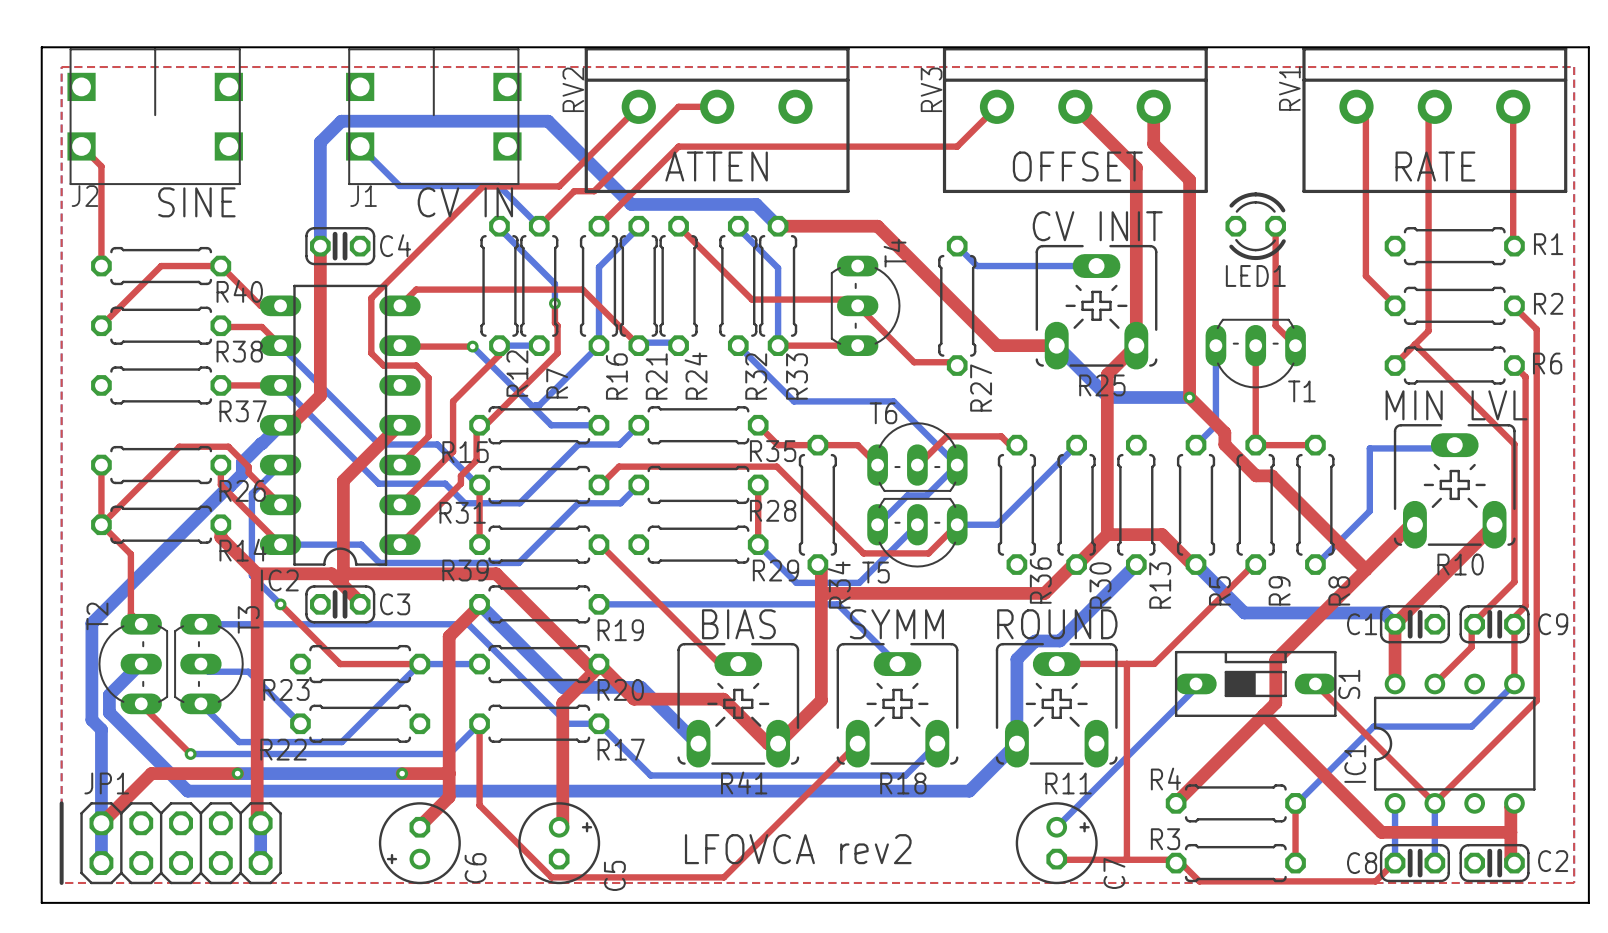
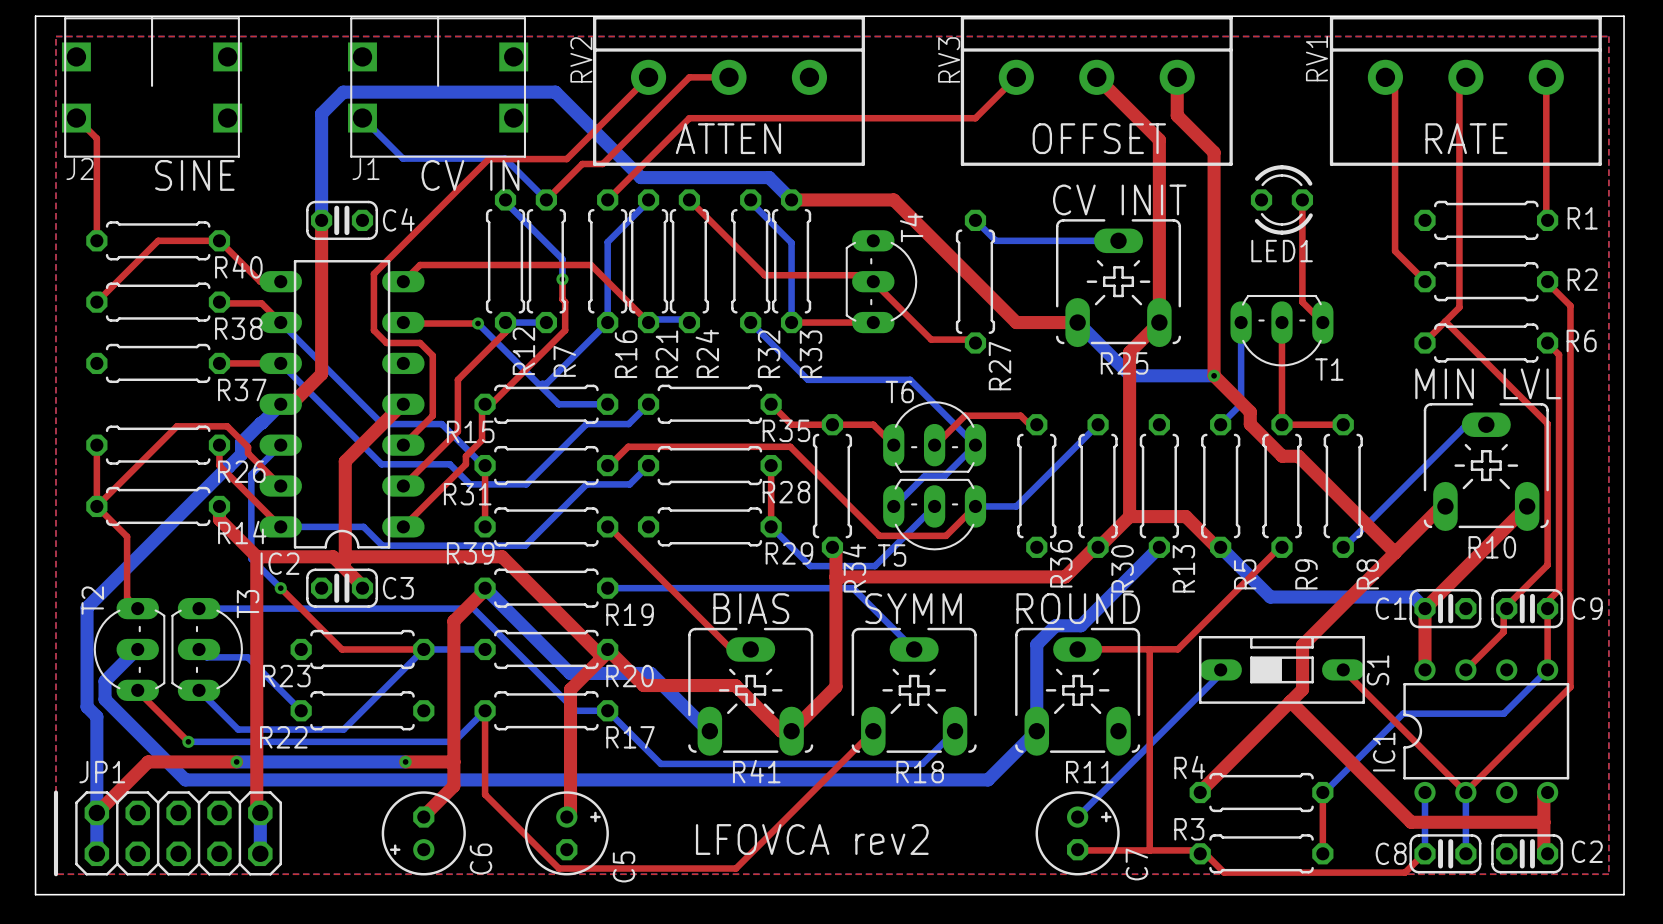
bottom track: (1432, 448) (1369, 448) (1369, 511) -> (1463, 428) (1399, 492)

